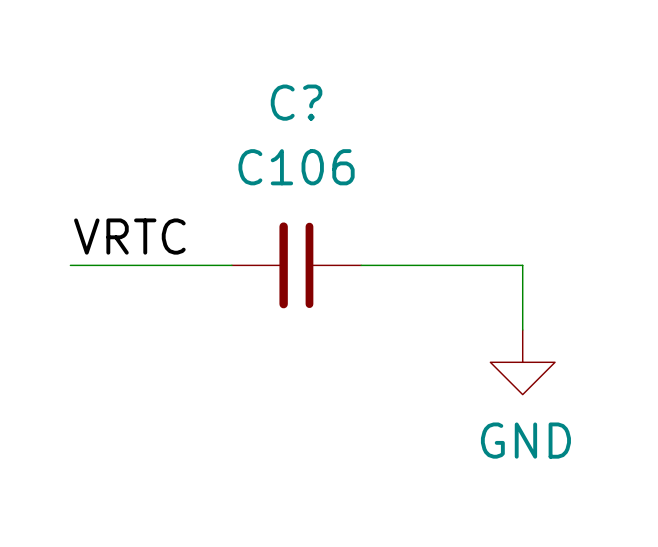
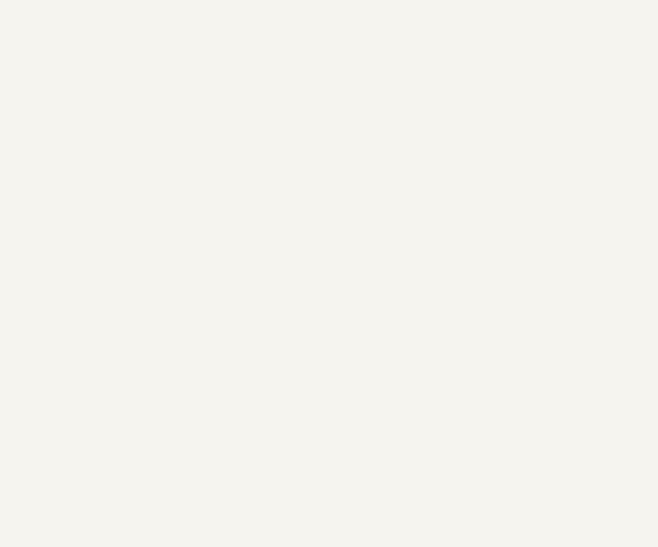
label: VRTC (129, 236) -> none
wire: (70, 265) (231, 265) -> none
C?: C106 (296, 265) -> none
wire: (361, 265) (522, 265) (522, 329) -> none
power symbol: GND (522, 362) -> none

